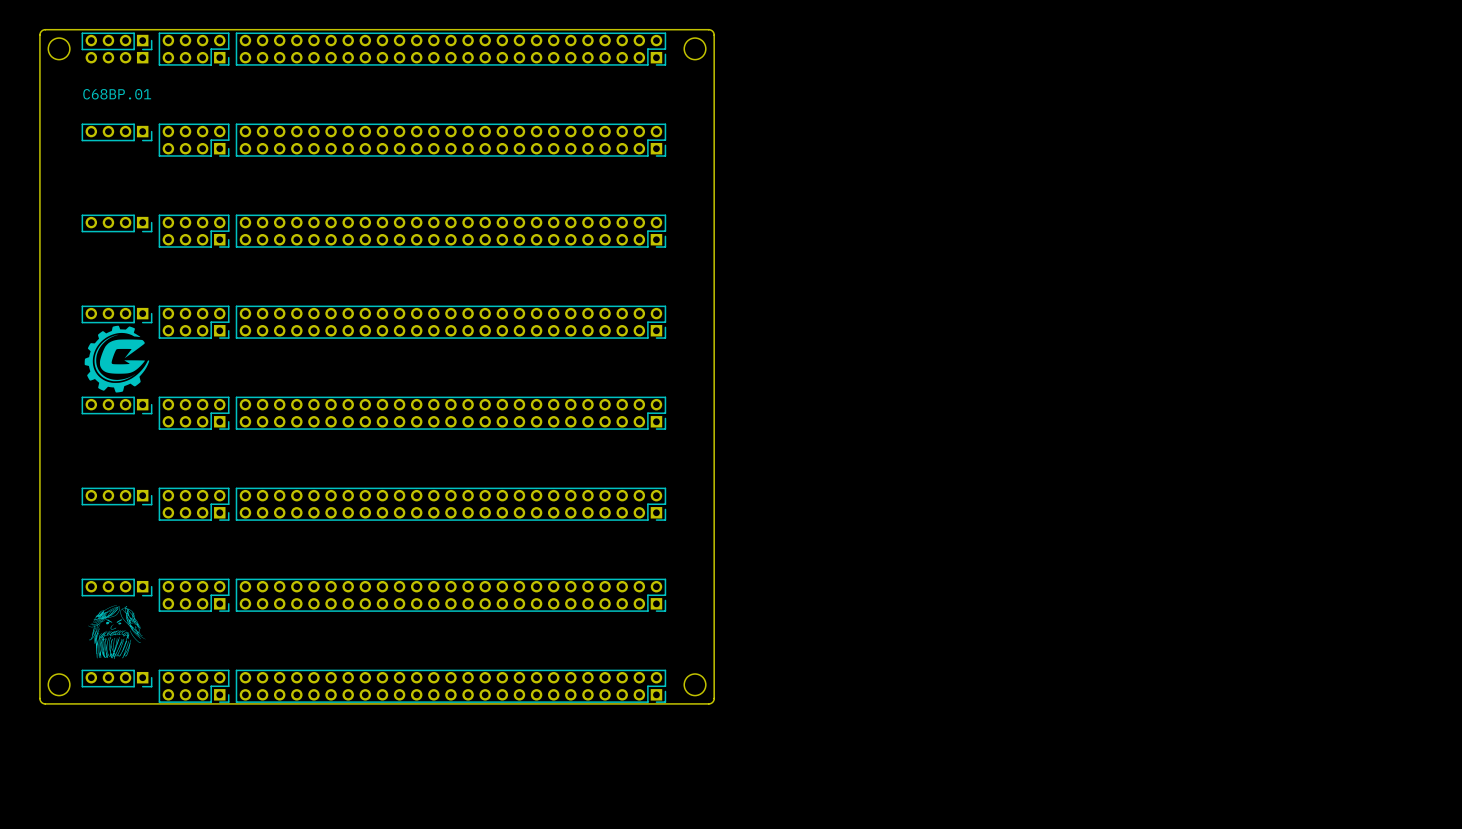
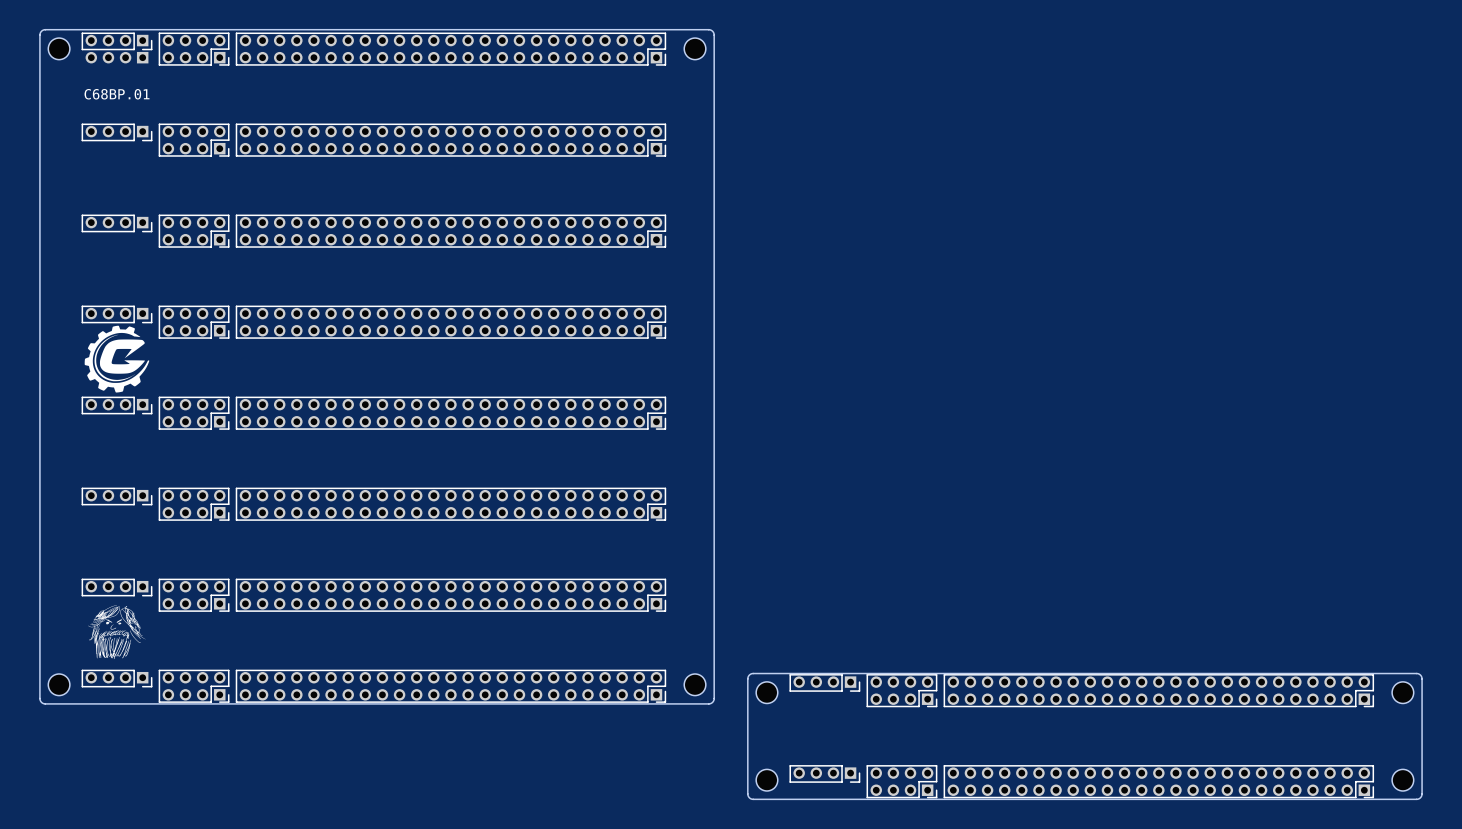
board edge: none -> (753, 673) (1417, 673) (1422, 678) (1422, 794) (1416, 799) (752, 799) (747, 793) (747, 678) (749, 675) (753, 673)
part: none -> (1081, 690)
part: none -> (766, 692)
part: none -> (1402, 692)
part: none -> (766, 780)
part: none -> (1402, 780)
part: none -> (1081, 781)

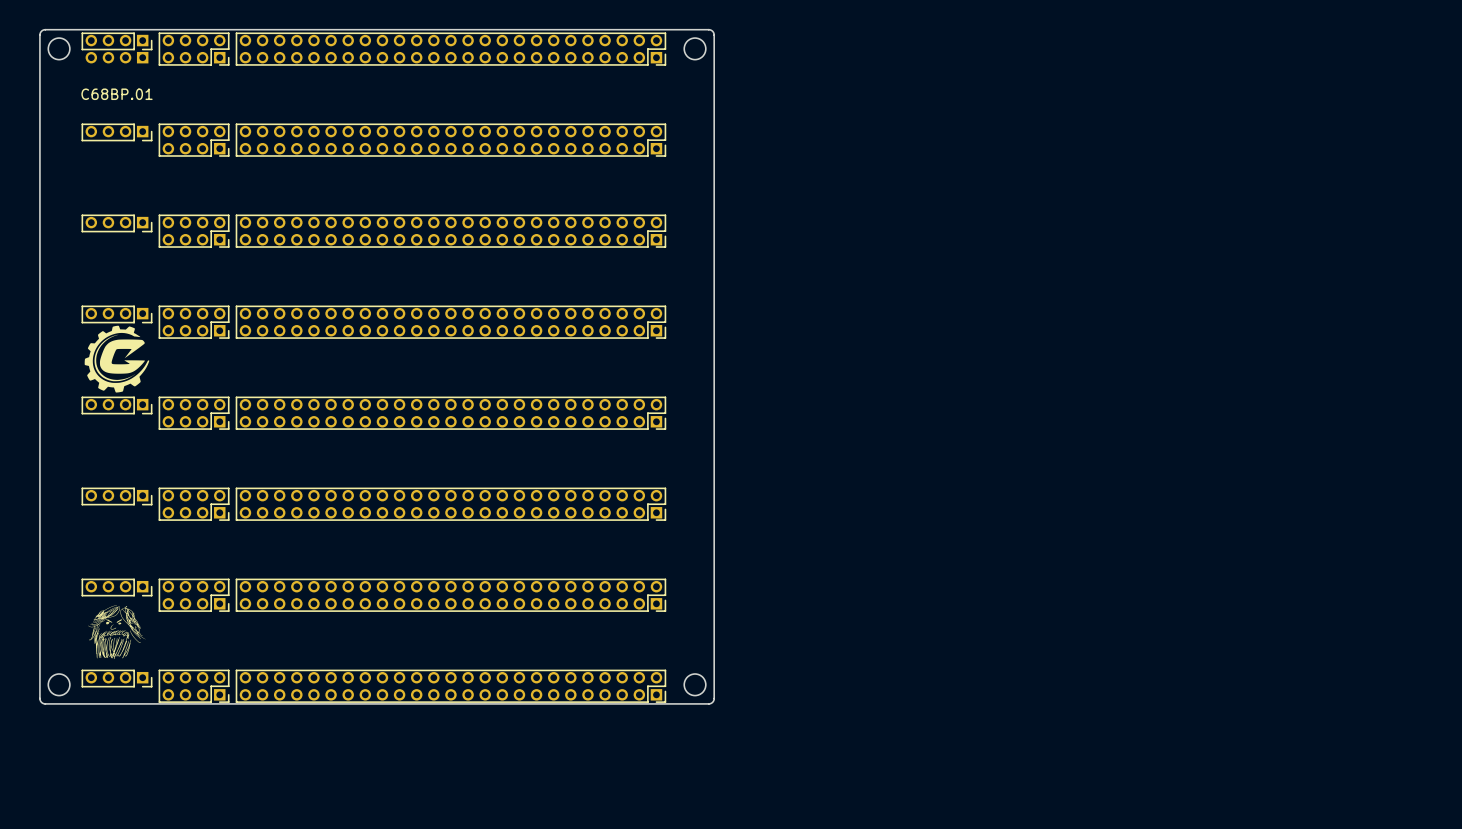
board edge: (753, 673) (1417, 673) (1422, 678) (1422, 794) (1416, 799) (752, 799) (747, 793) (747, 678) (749, 675) (753, 673) -> none
part: (1081, 690) -> none
part: (766, 692) -> none
part: (1402, 692) -> none
part: (766, 780) -> none
part: (1402, 780) -> none
part: (1081, 781) -> none

